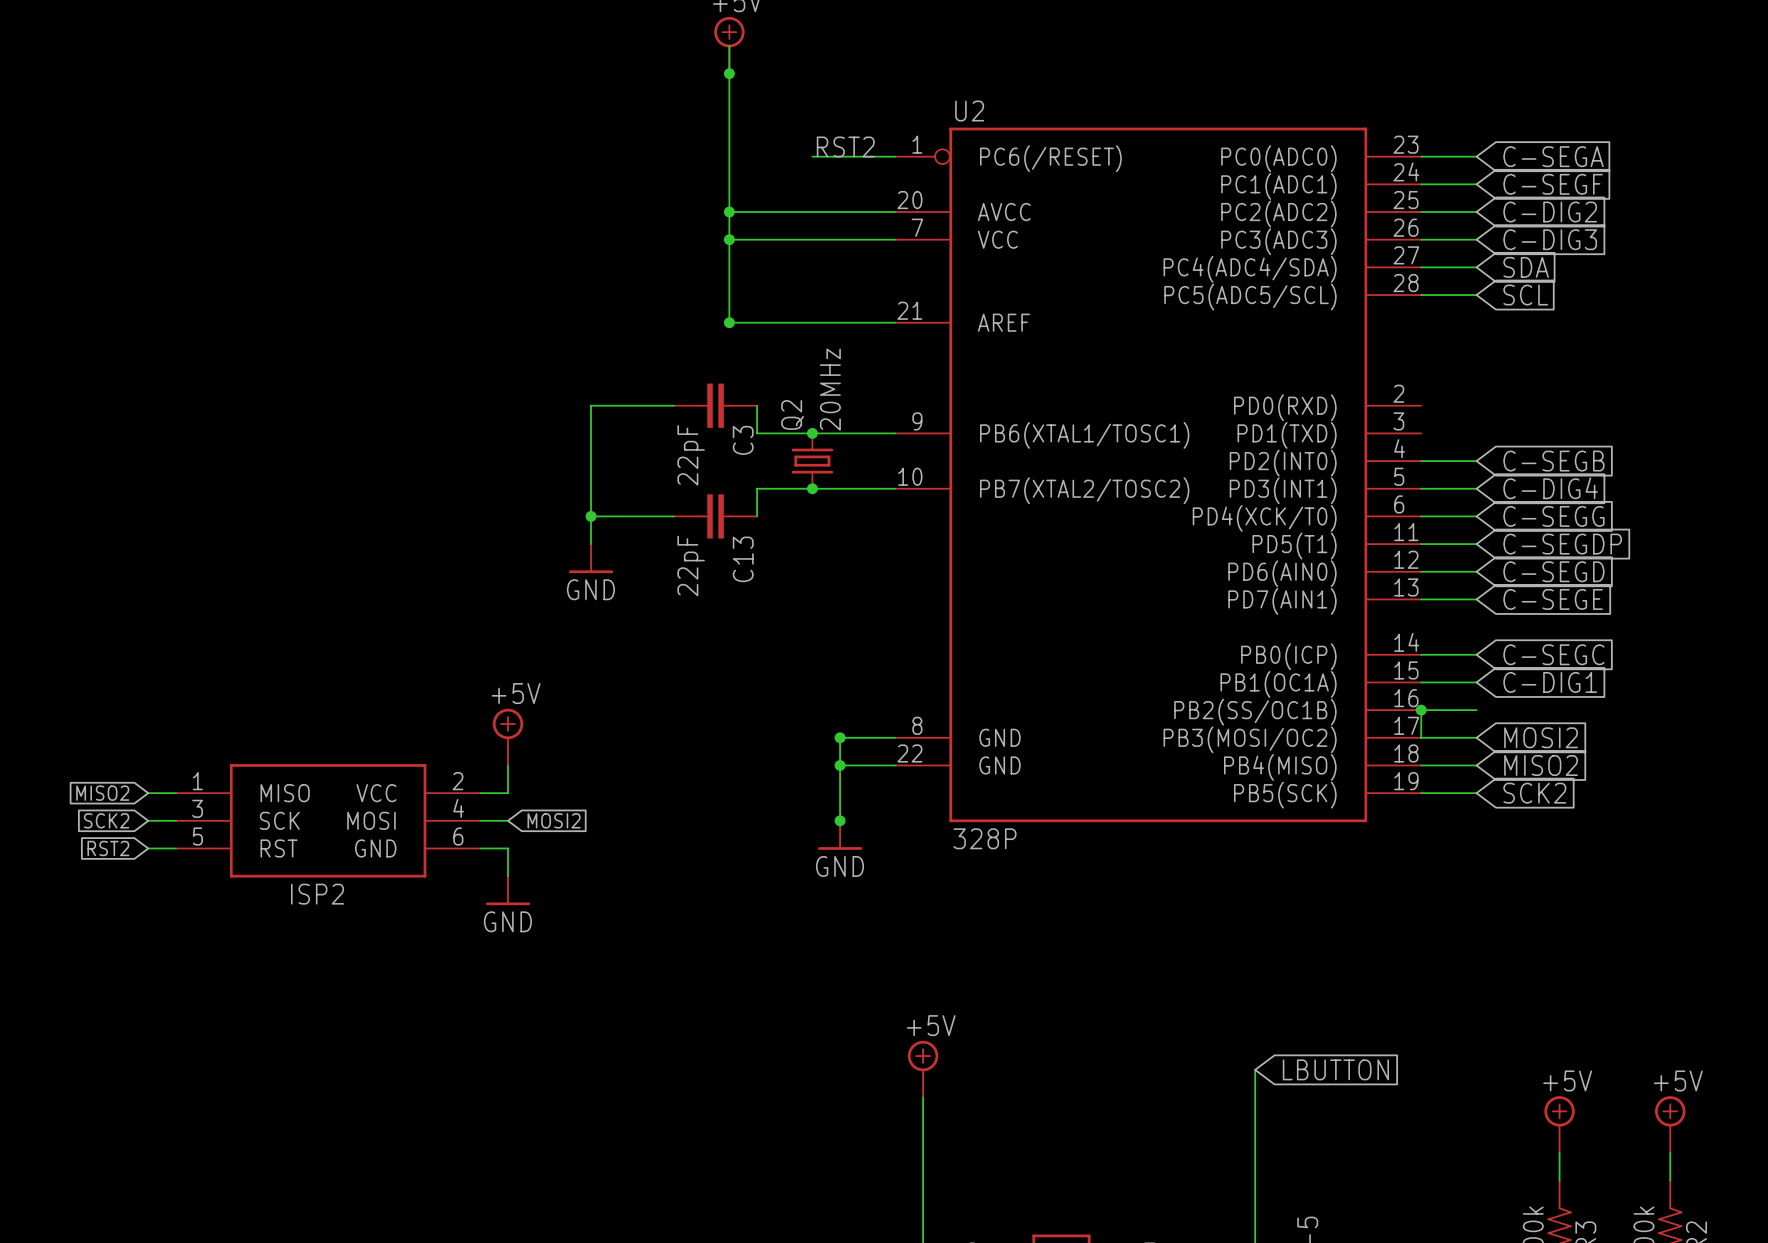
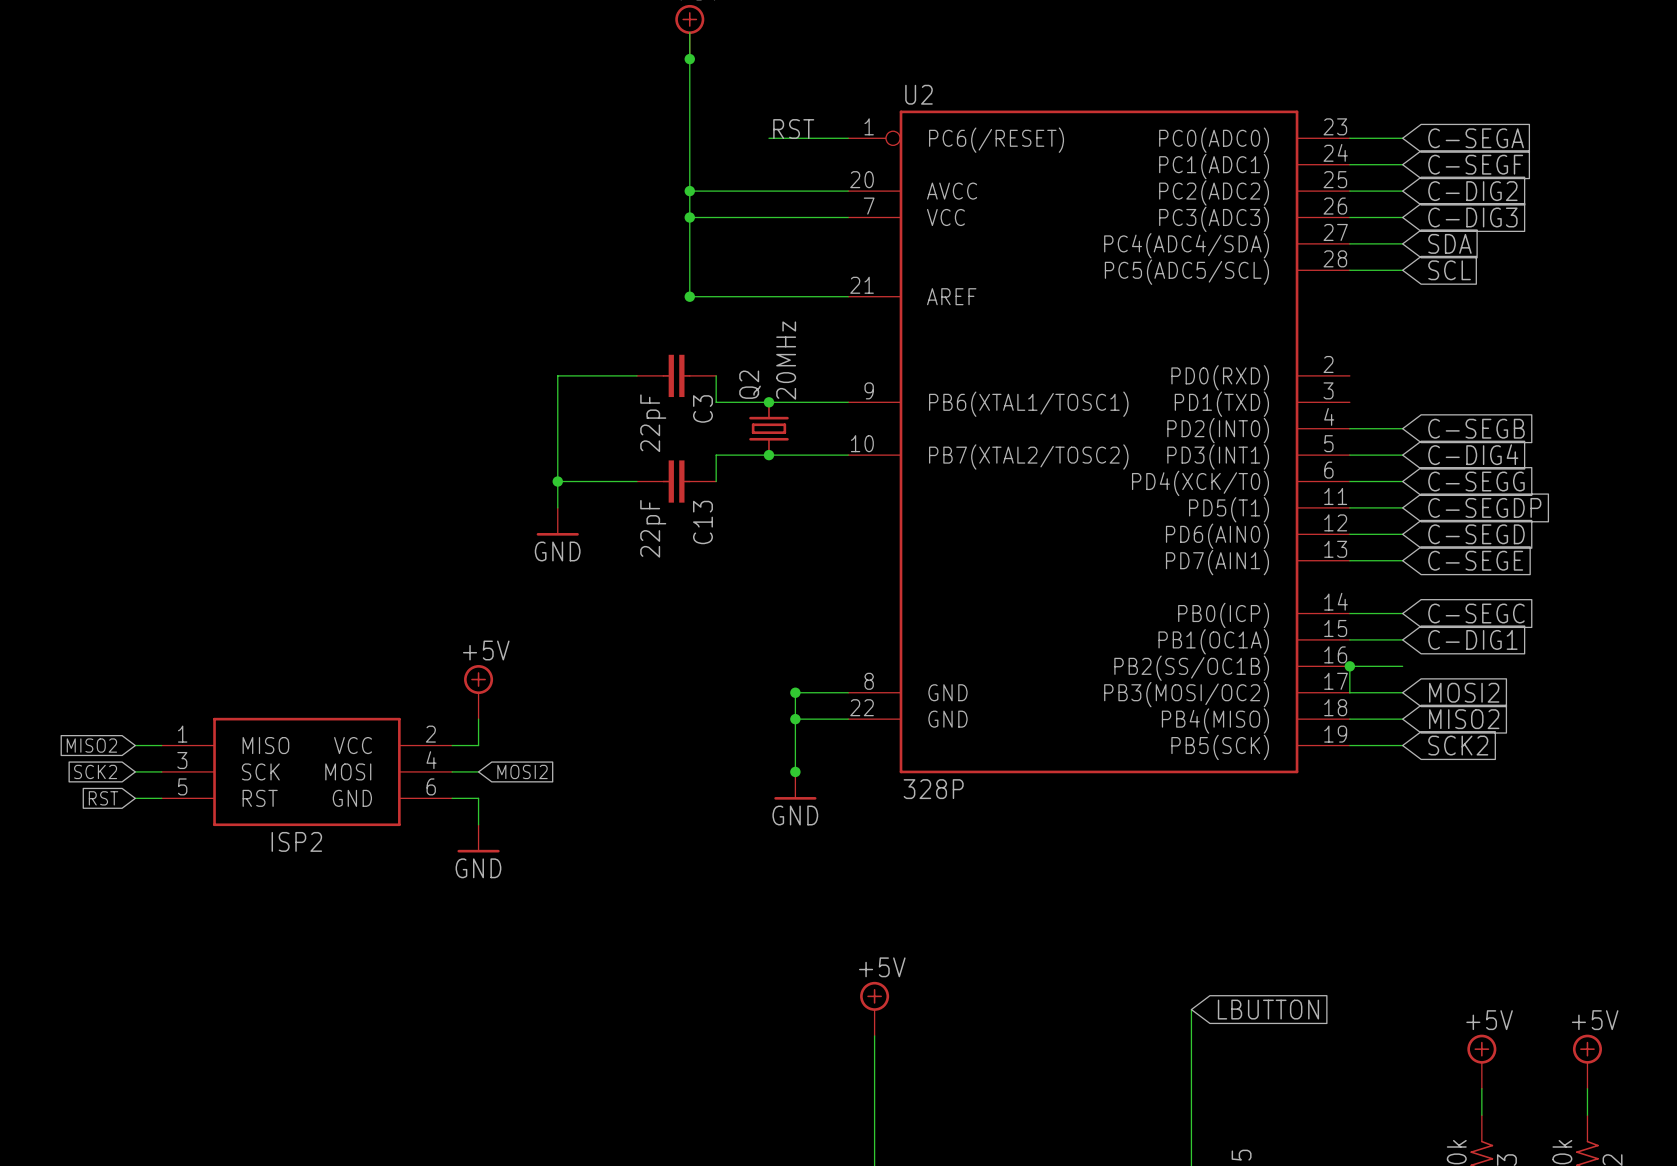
label: RST2 (845, 146) -> RST (793, 129)
global label: RST2 (108, 848) -> RST (103, 798)

